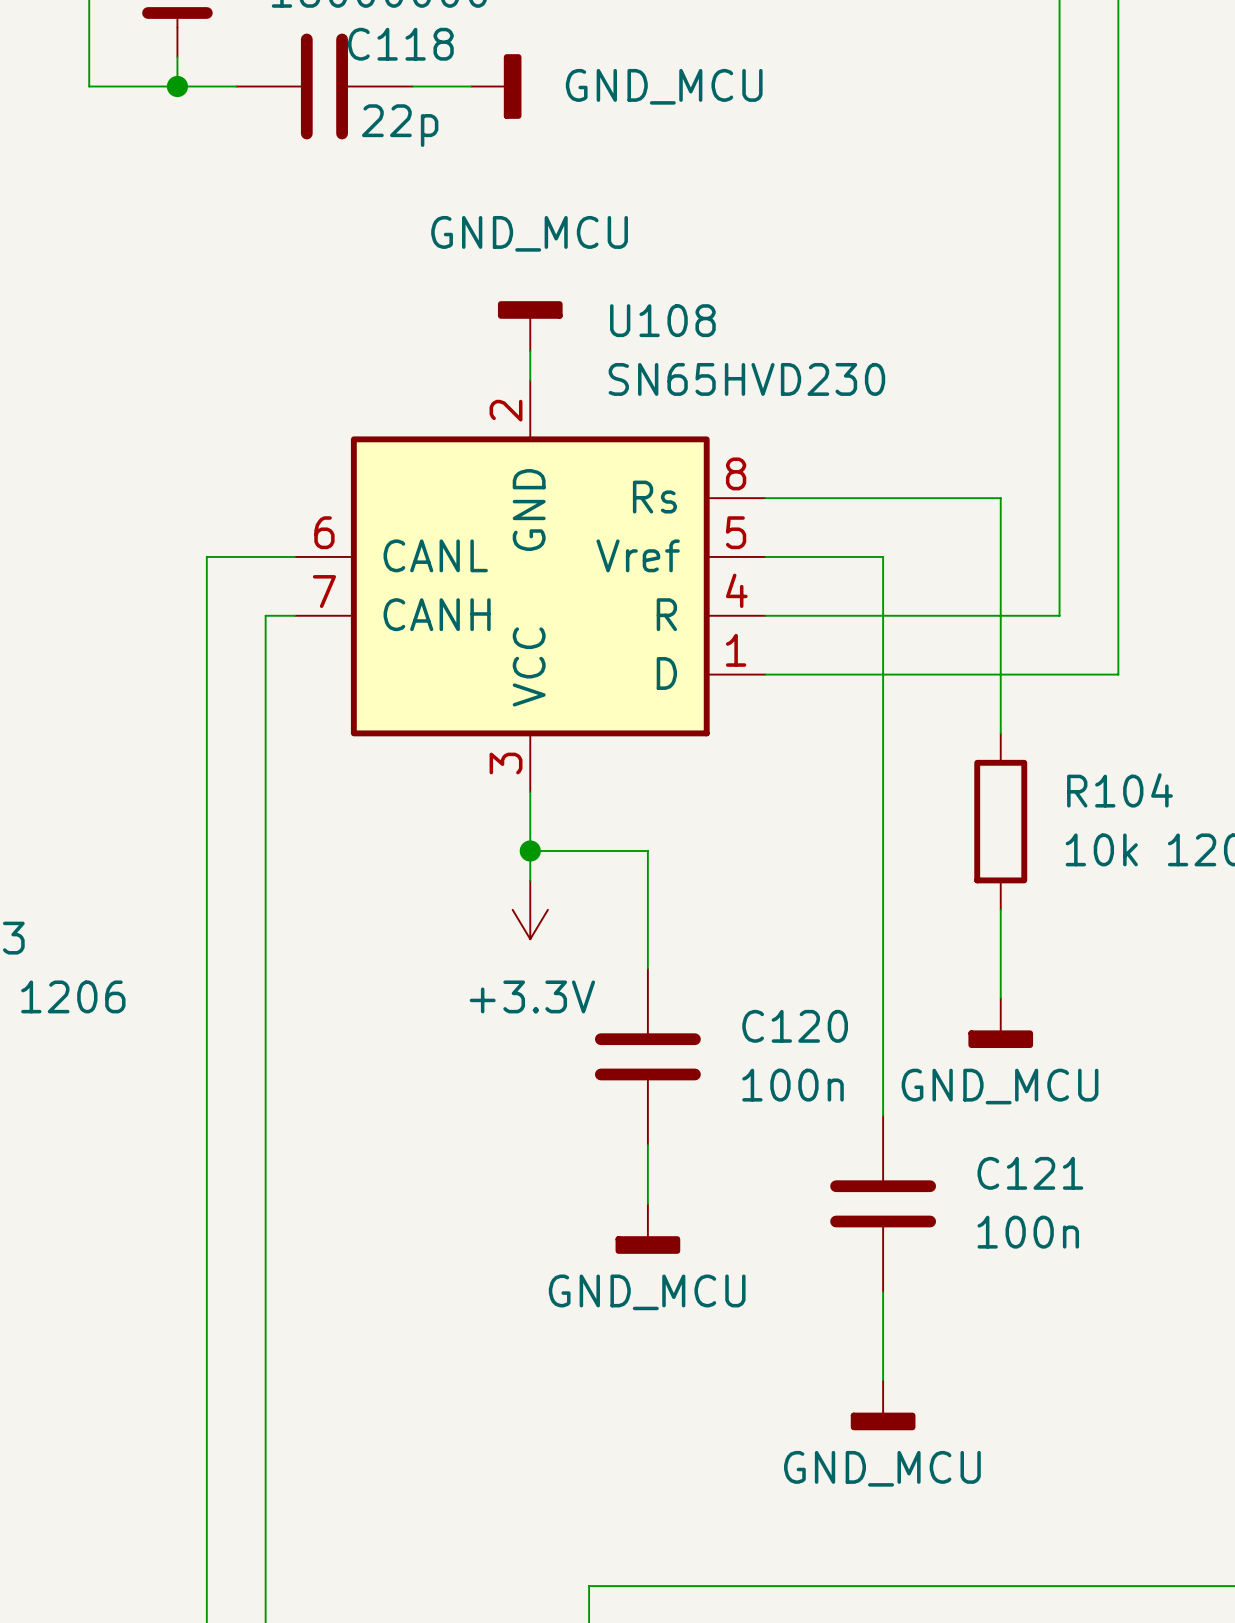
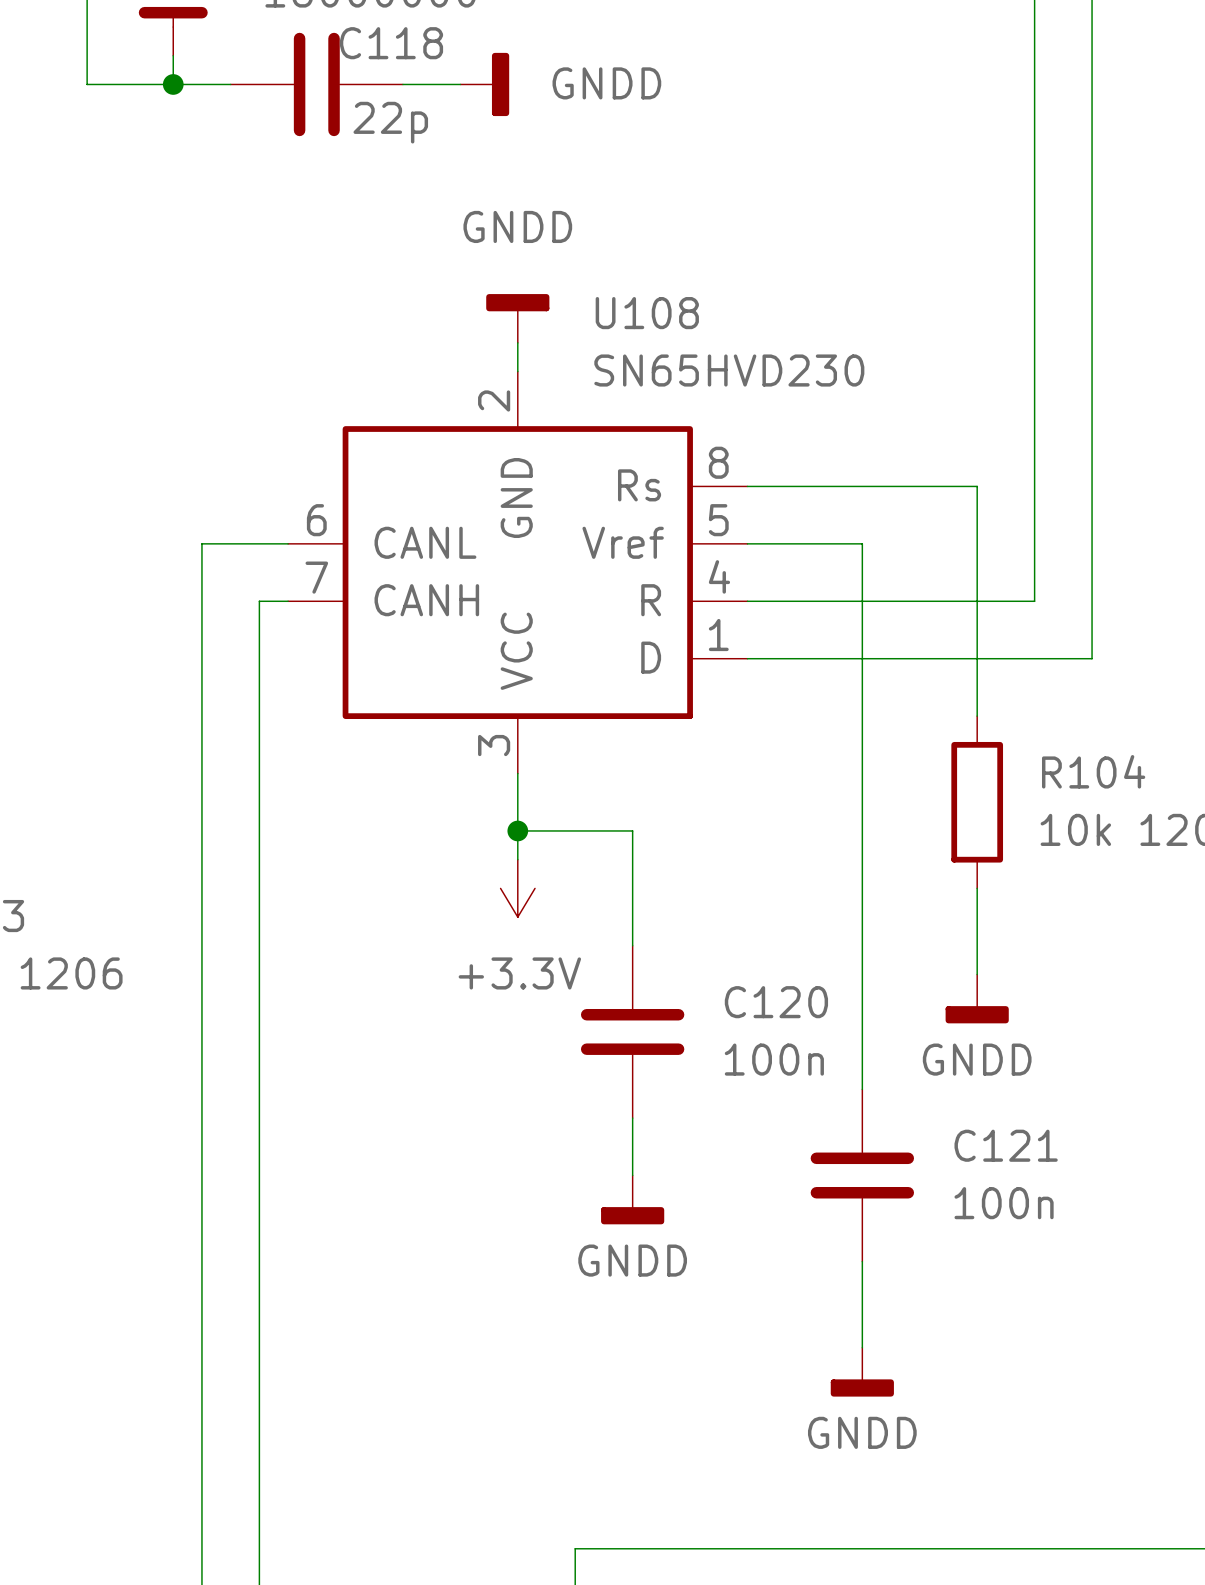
power symbol: GND_MCU (496, 86) -> GNDD (484, 84)
power symbol: GND_MCU (530, 326) -> GNDD (517, 318)
power symbol: GND_MCU (1000, 1023) -> GNDD (977, 998)
power symbol: GND_MCU (647, 1228) -> GNDD (632, 1199)
power symbol: GND_MCU (883, 1405) -> GNDD (862, 1372)

